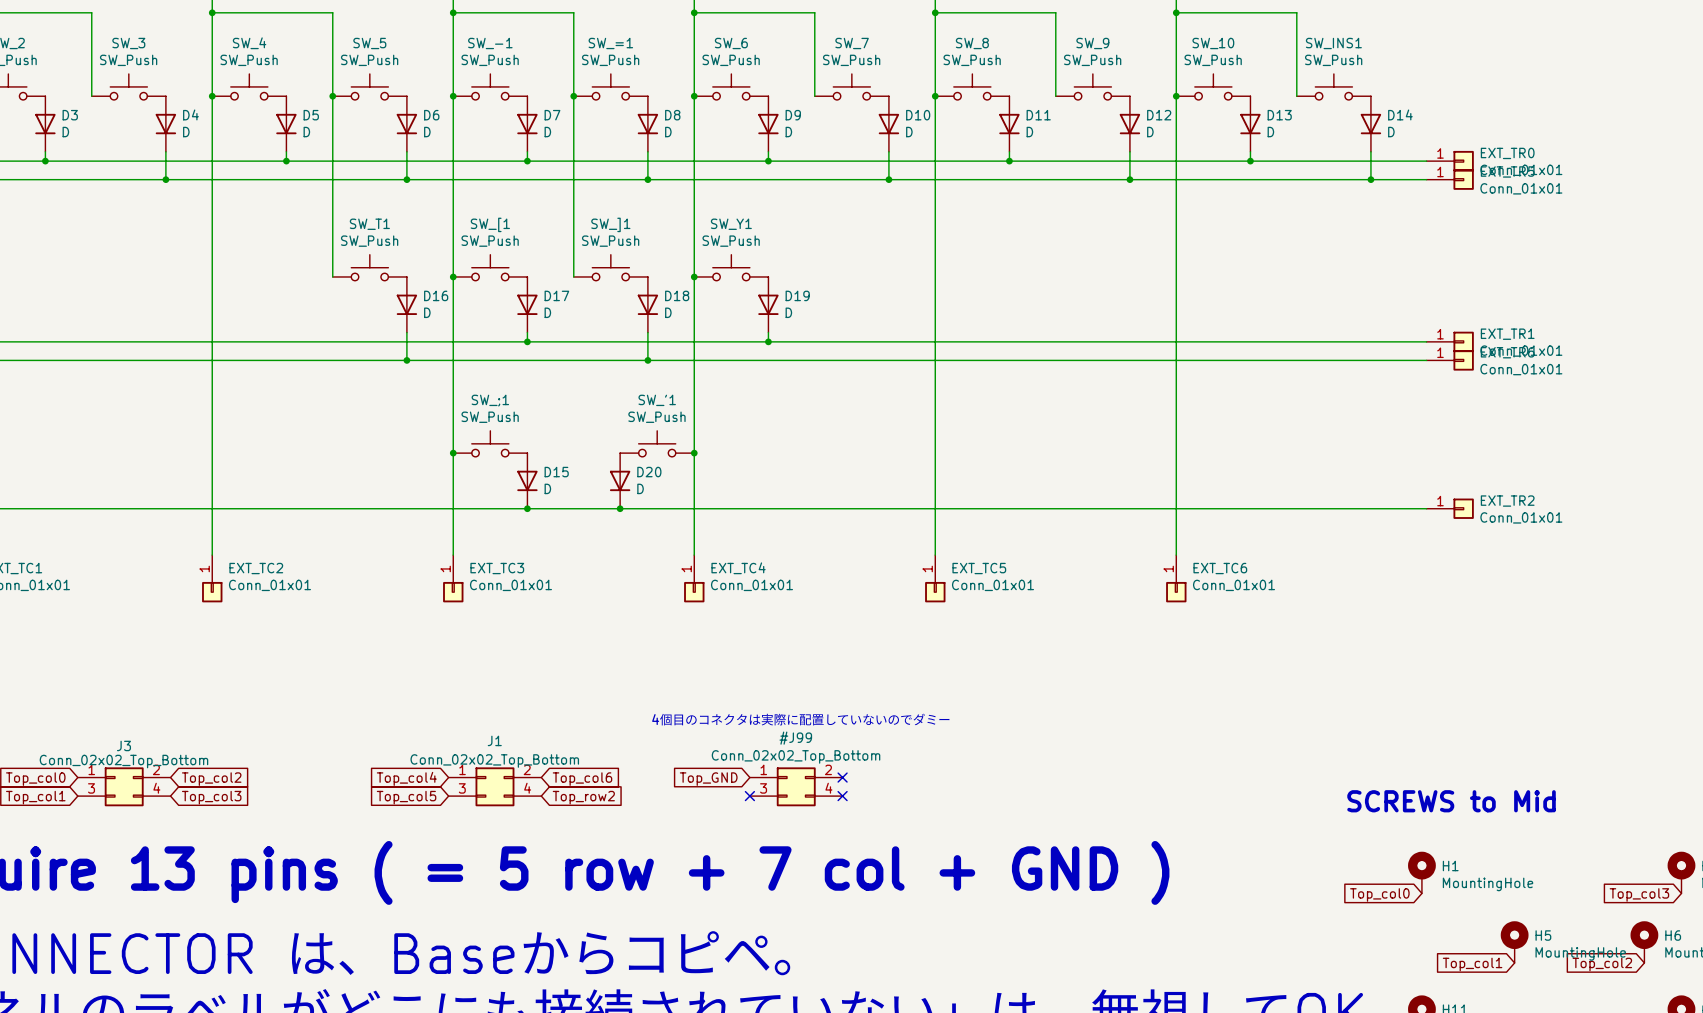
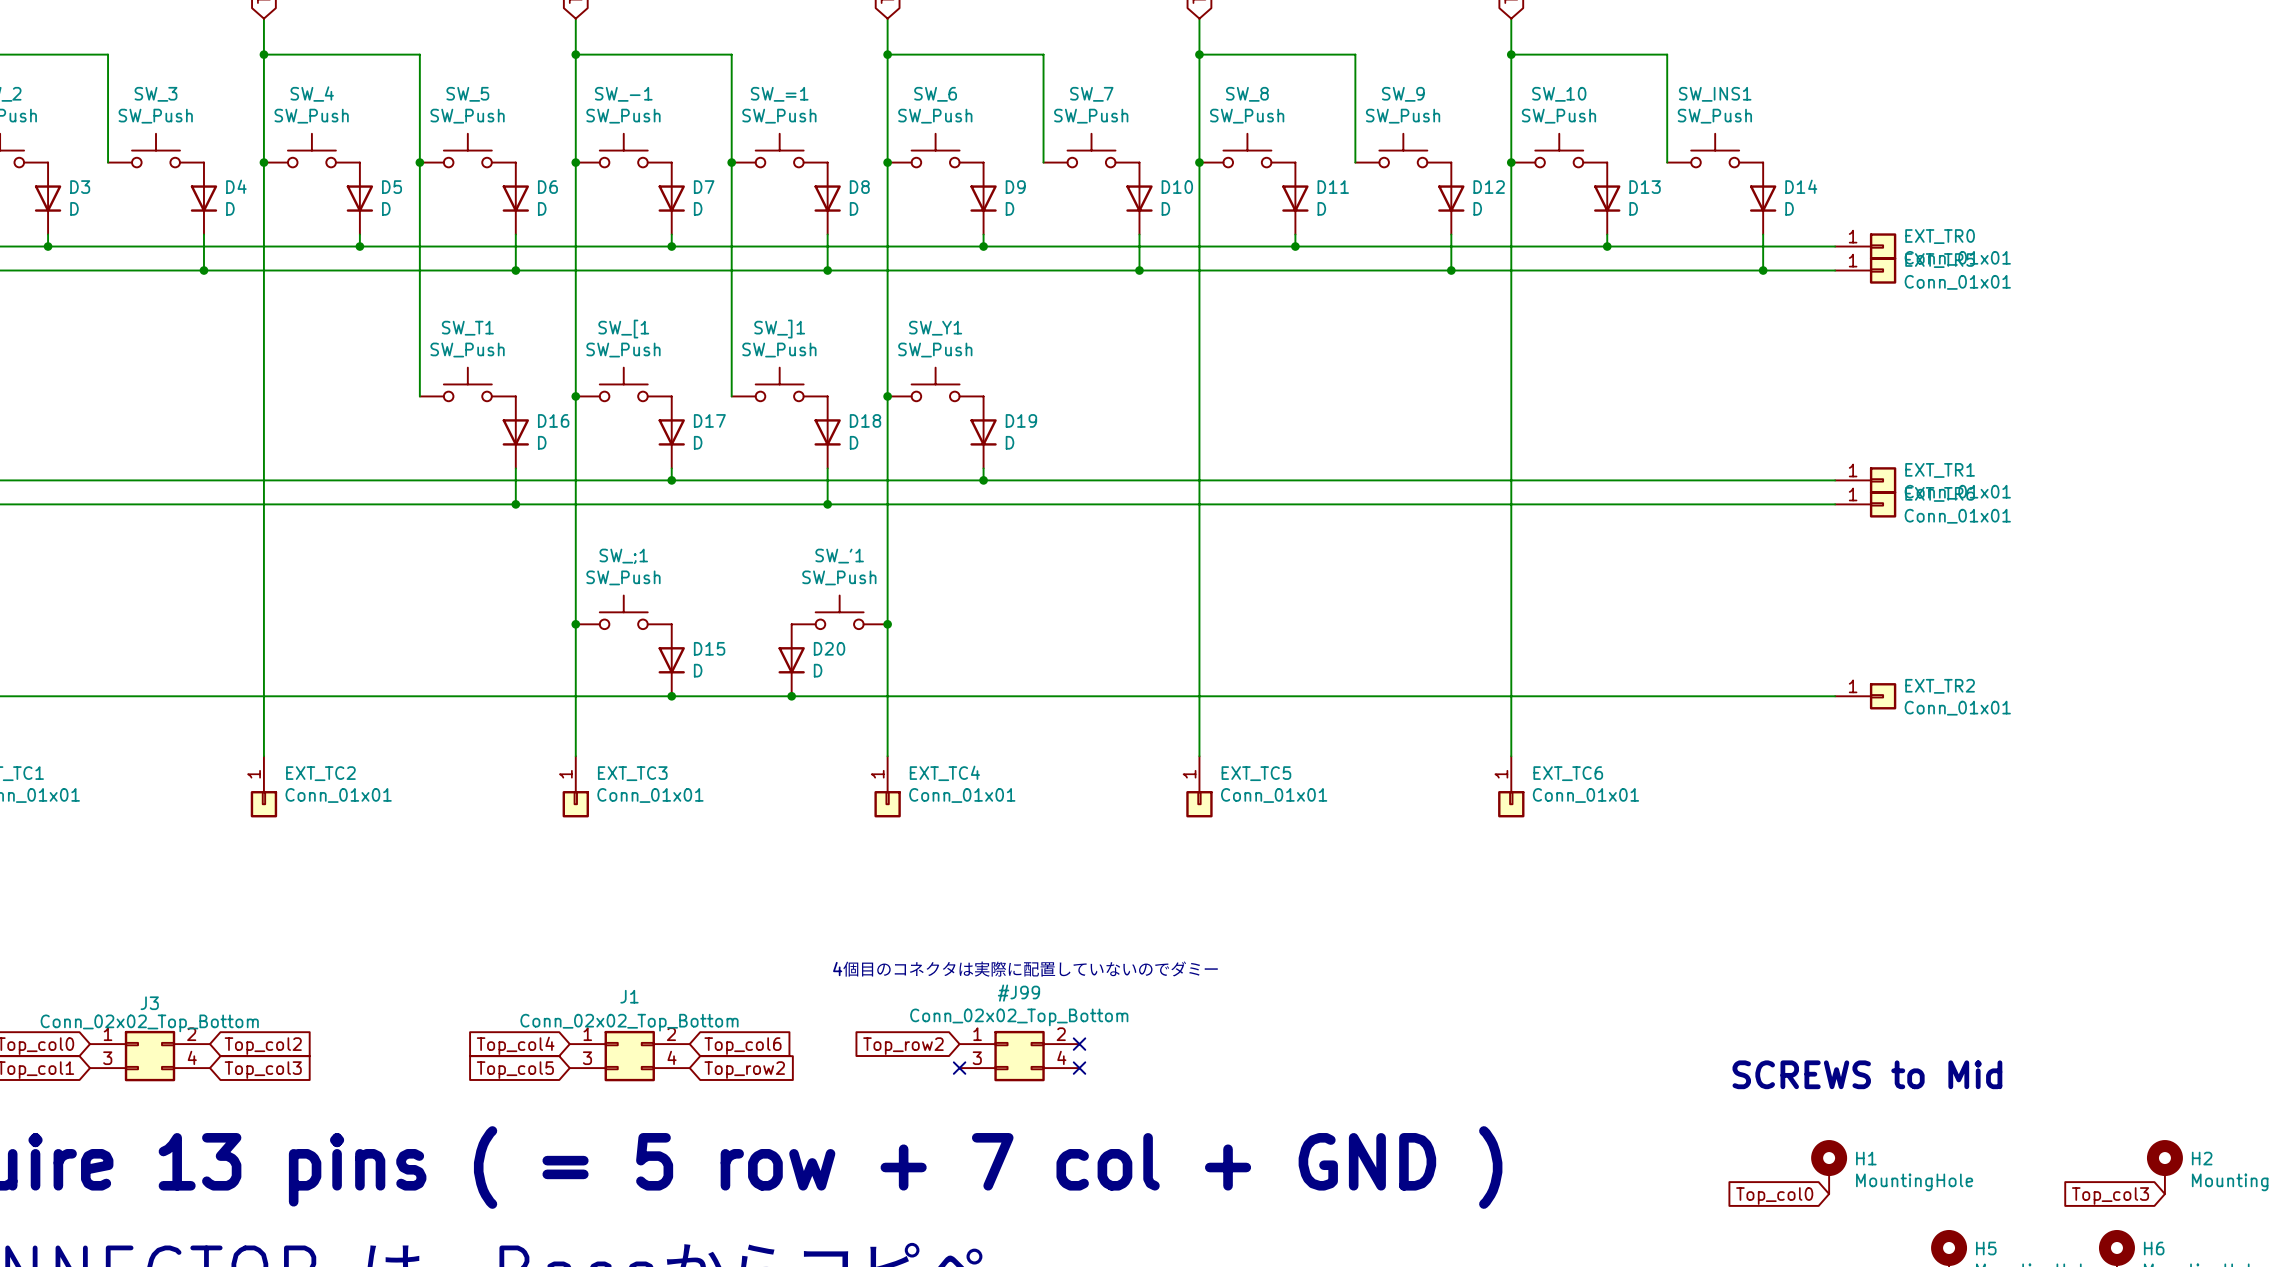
global label: Top_GND (708, 779) -> Top_row2 (903, 1046)

